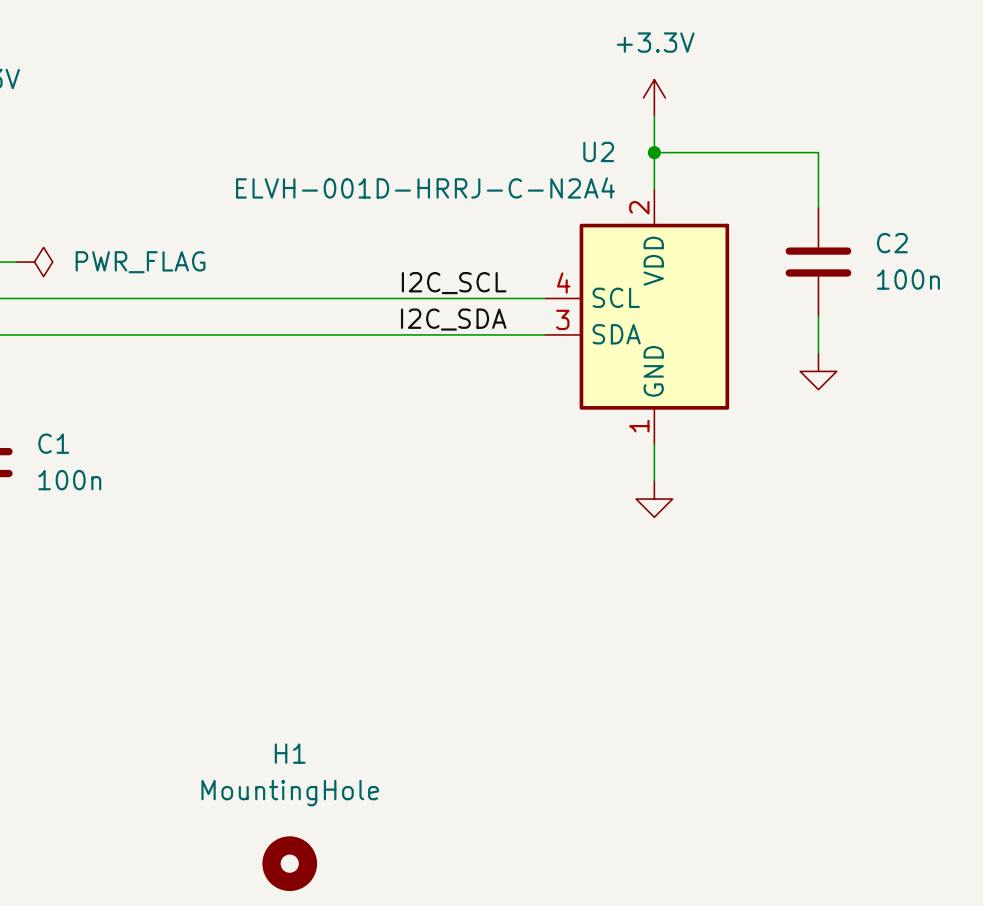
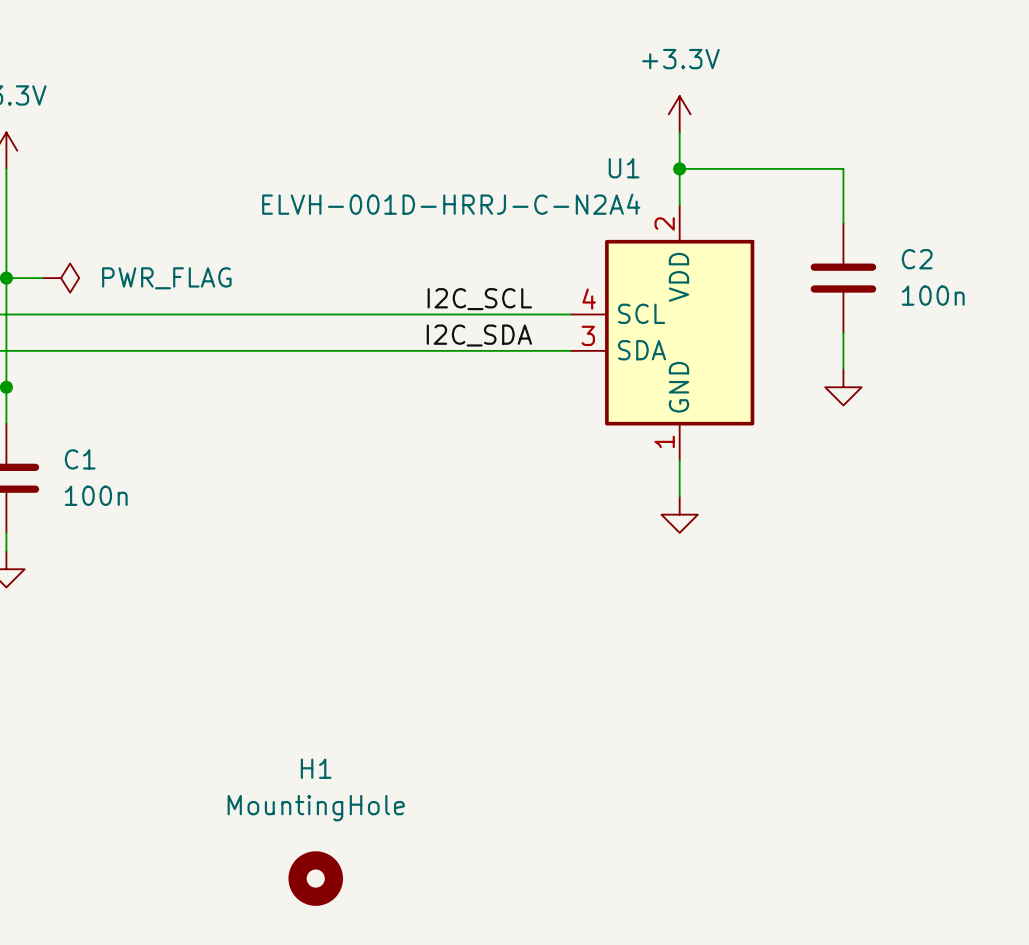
U2 name: U2 (598, 151) -> U1 (624, 168)

